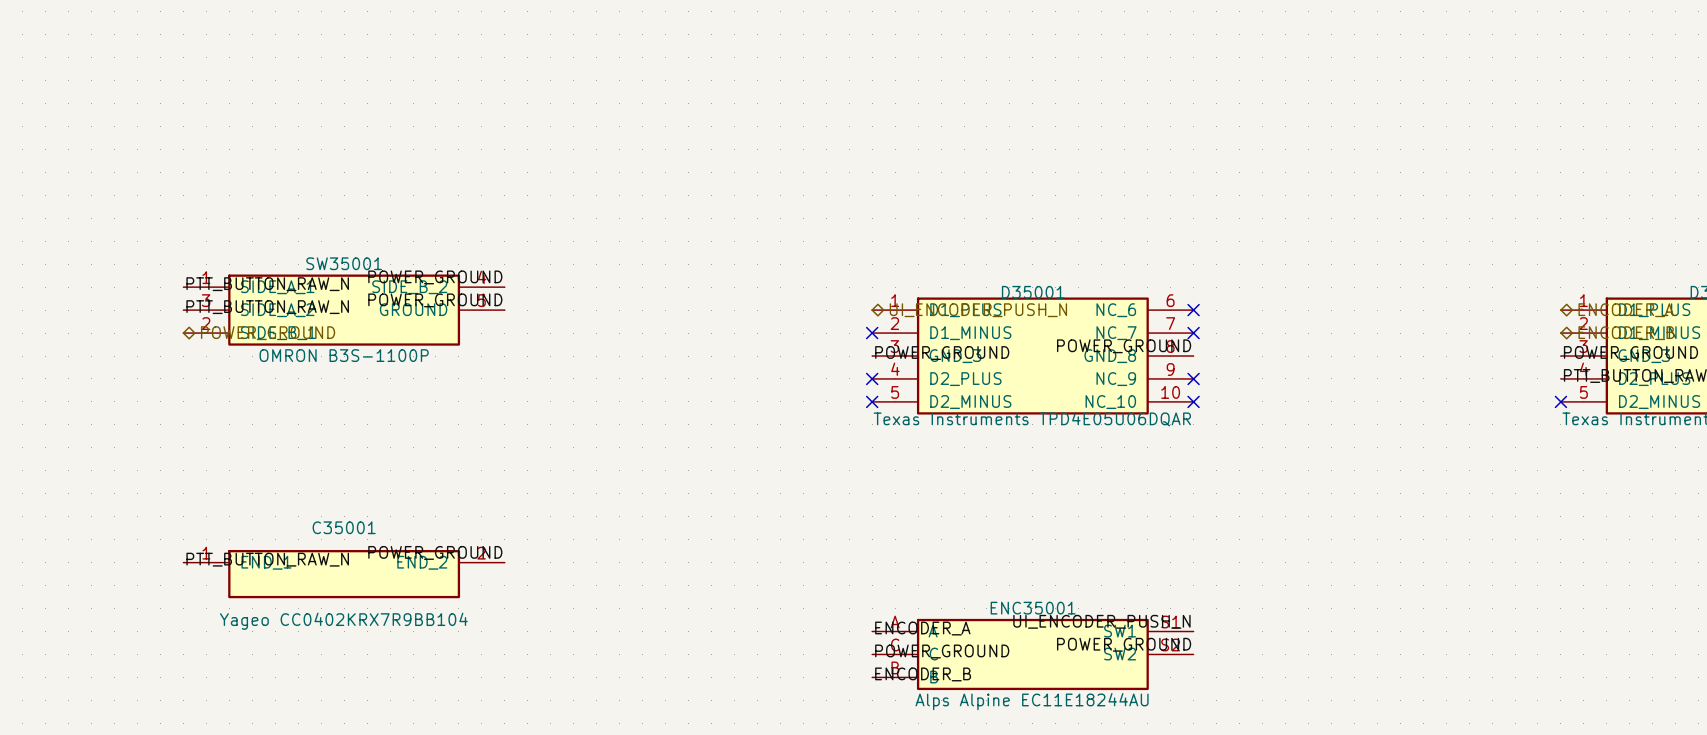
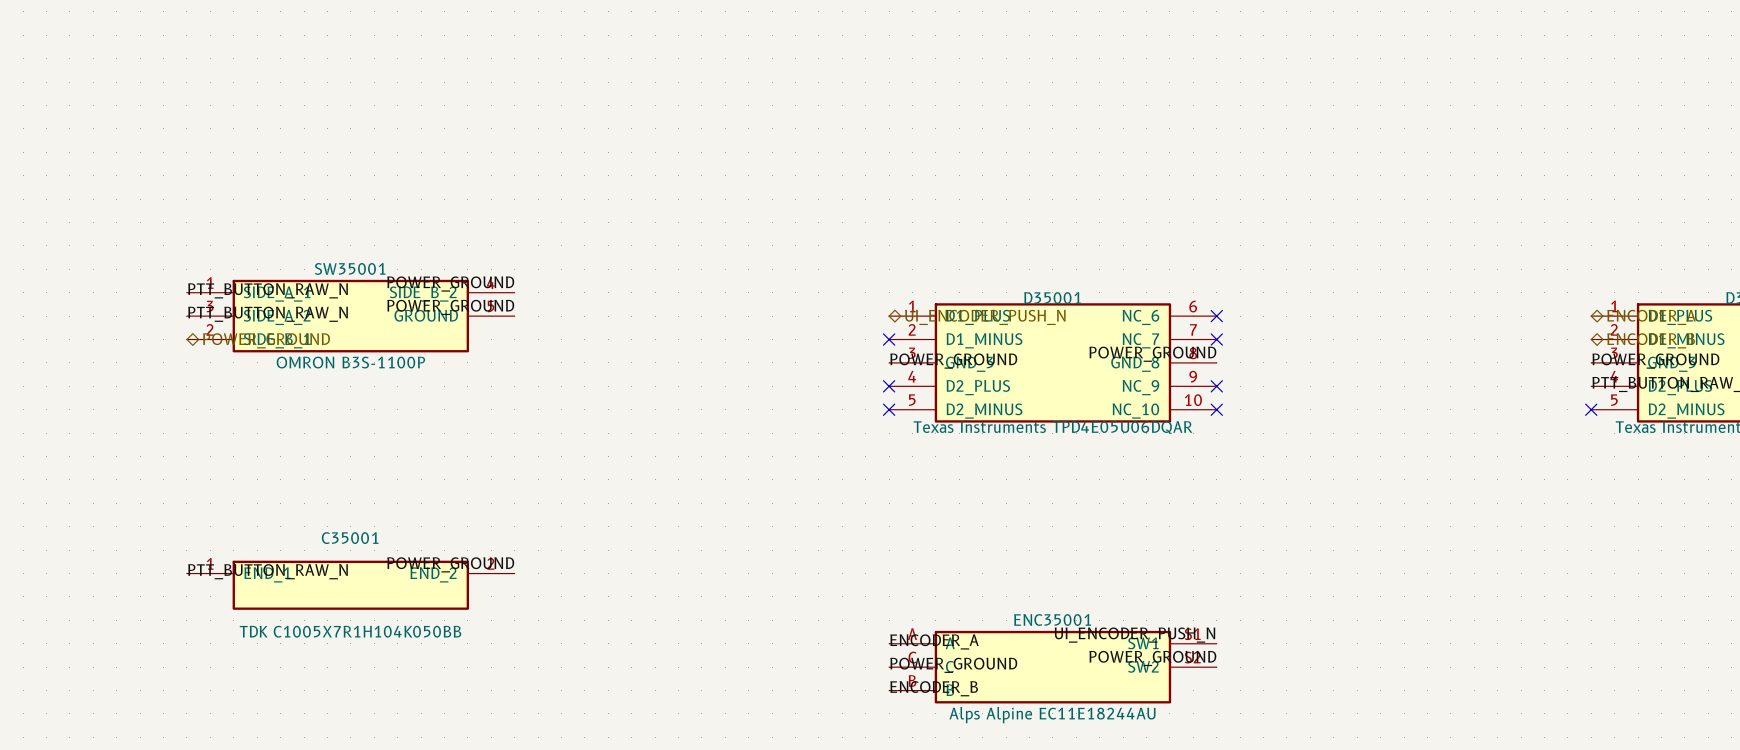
C35001 value: Yageo CC0402KRX7R9BB104 (343, 621) -> TDK C1005X7R1H104K050BB (350, 631)

